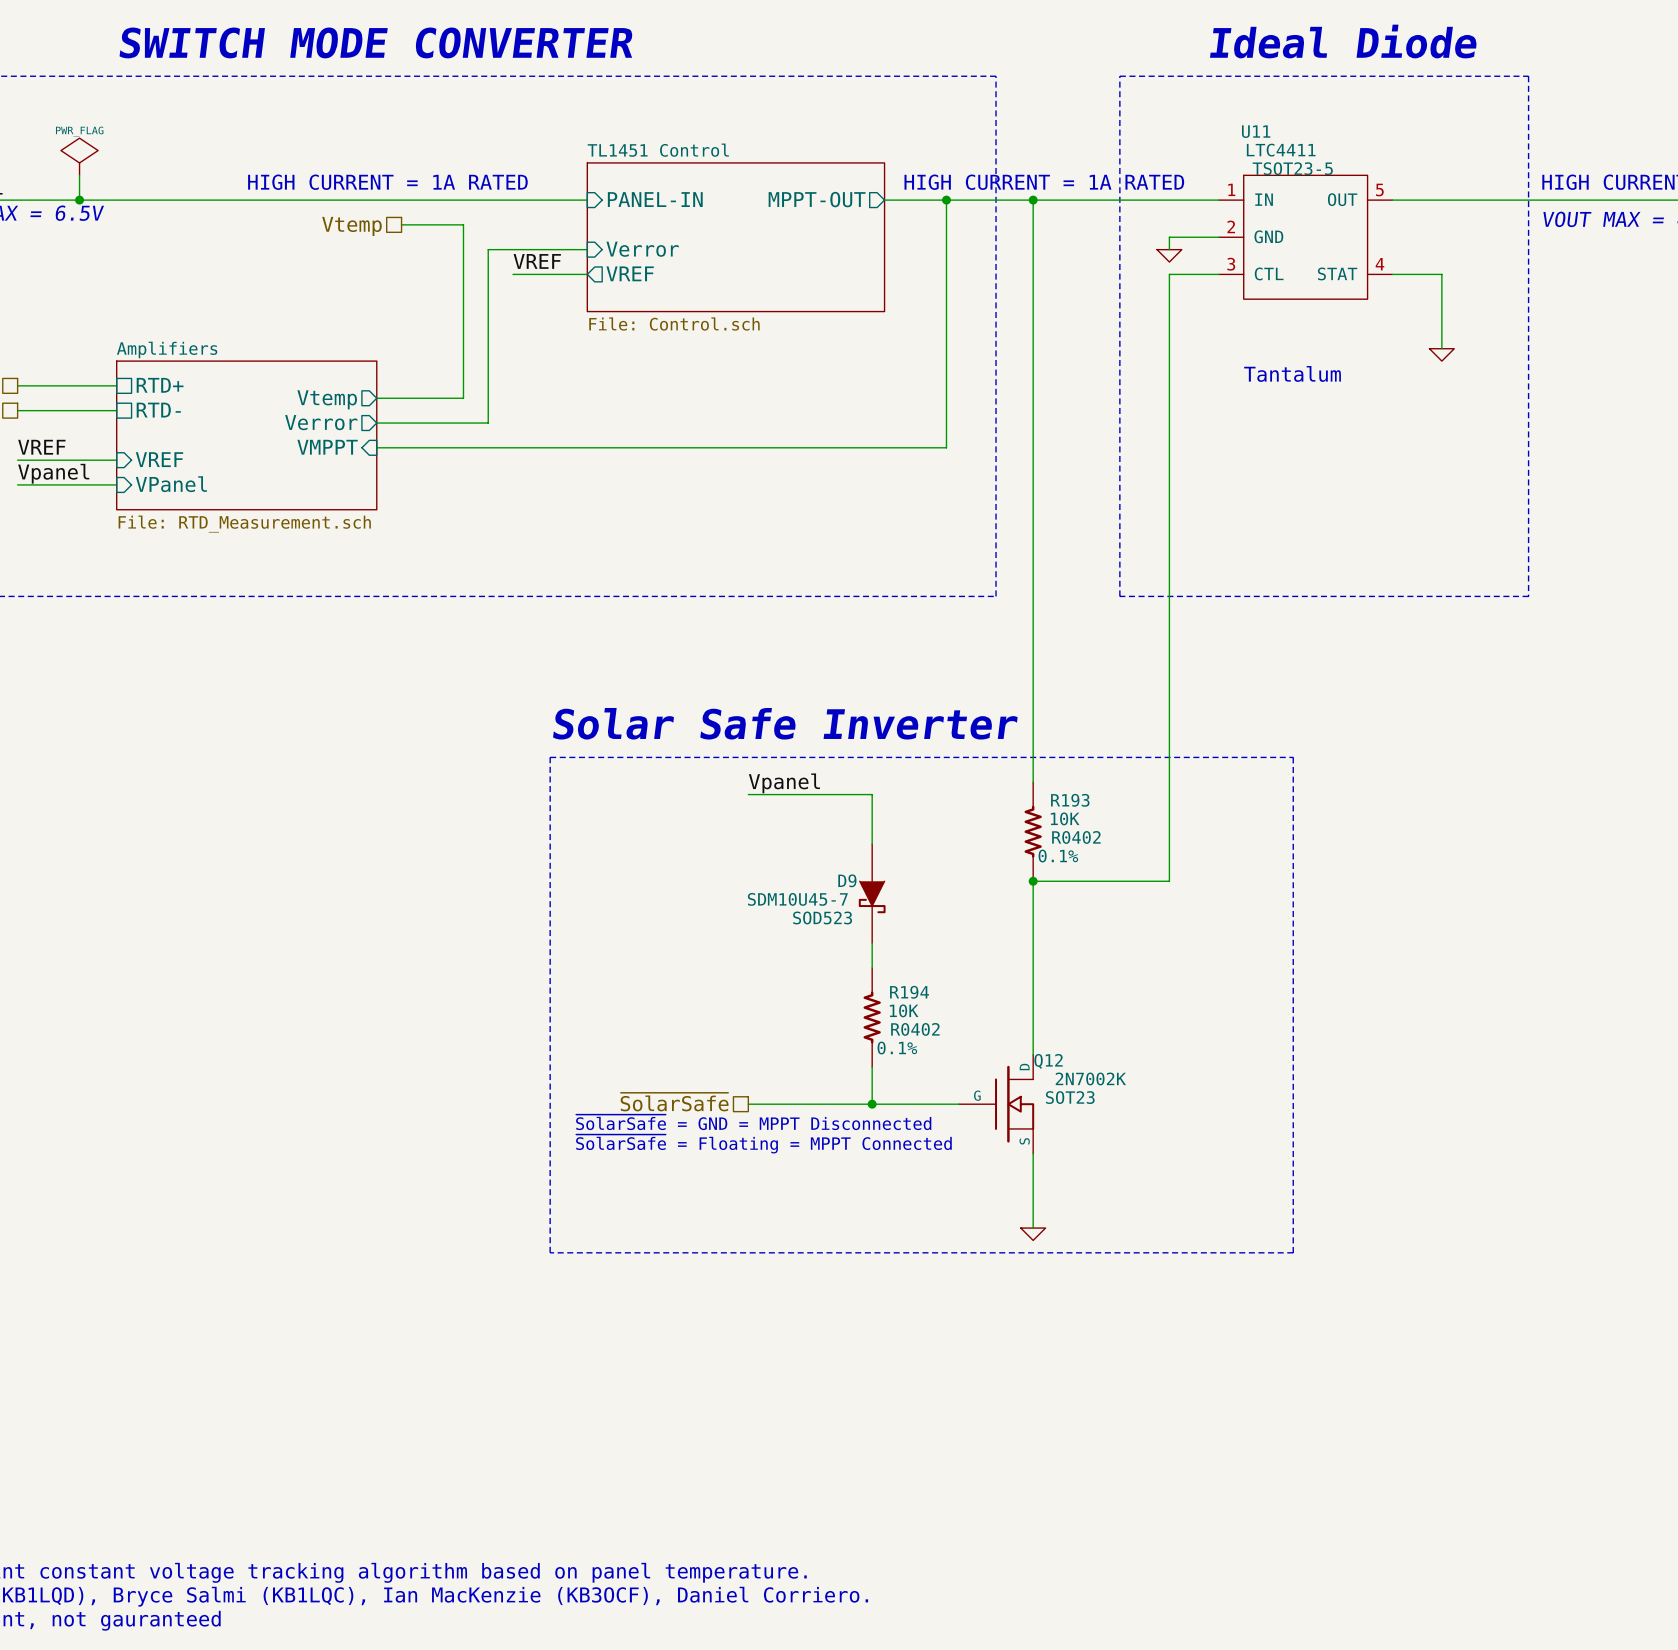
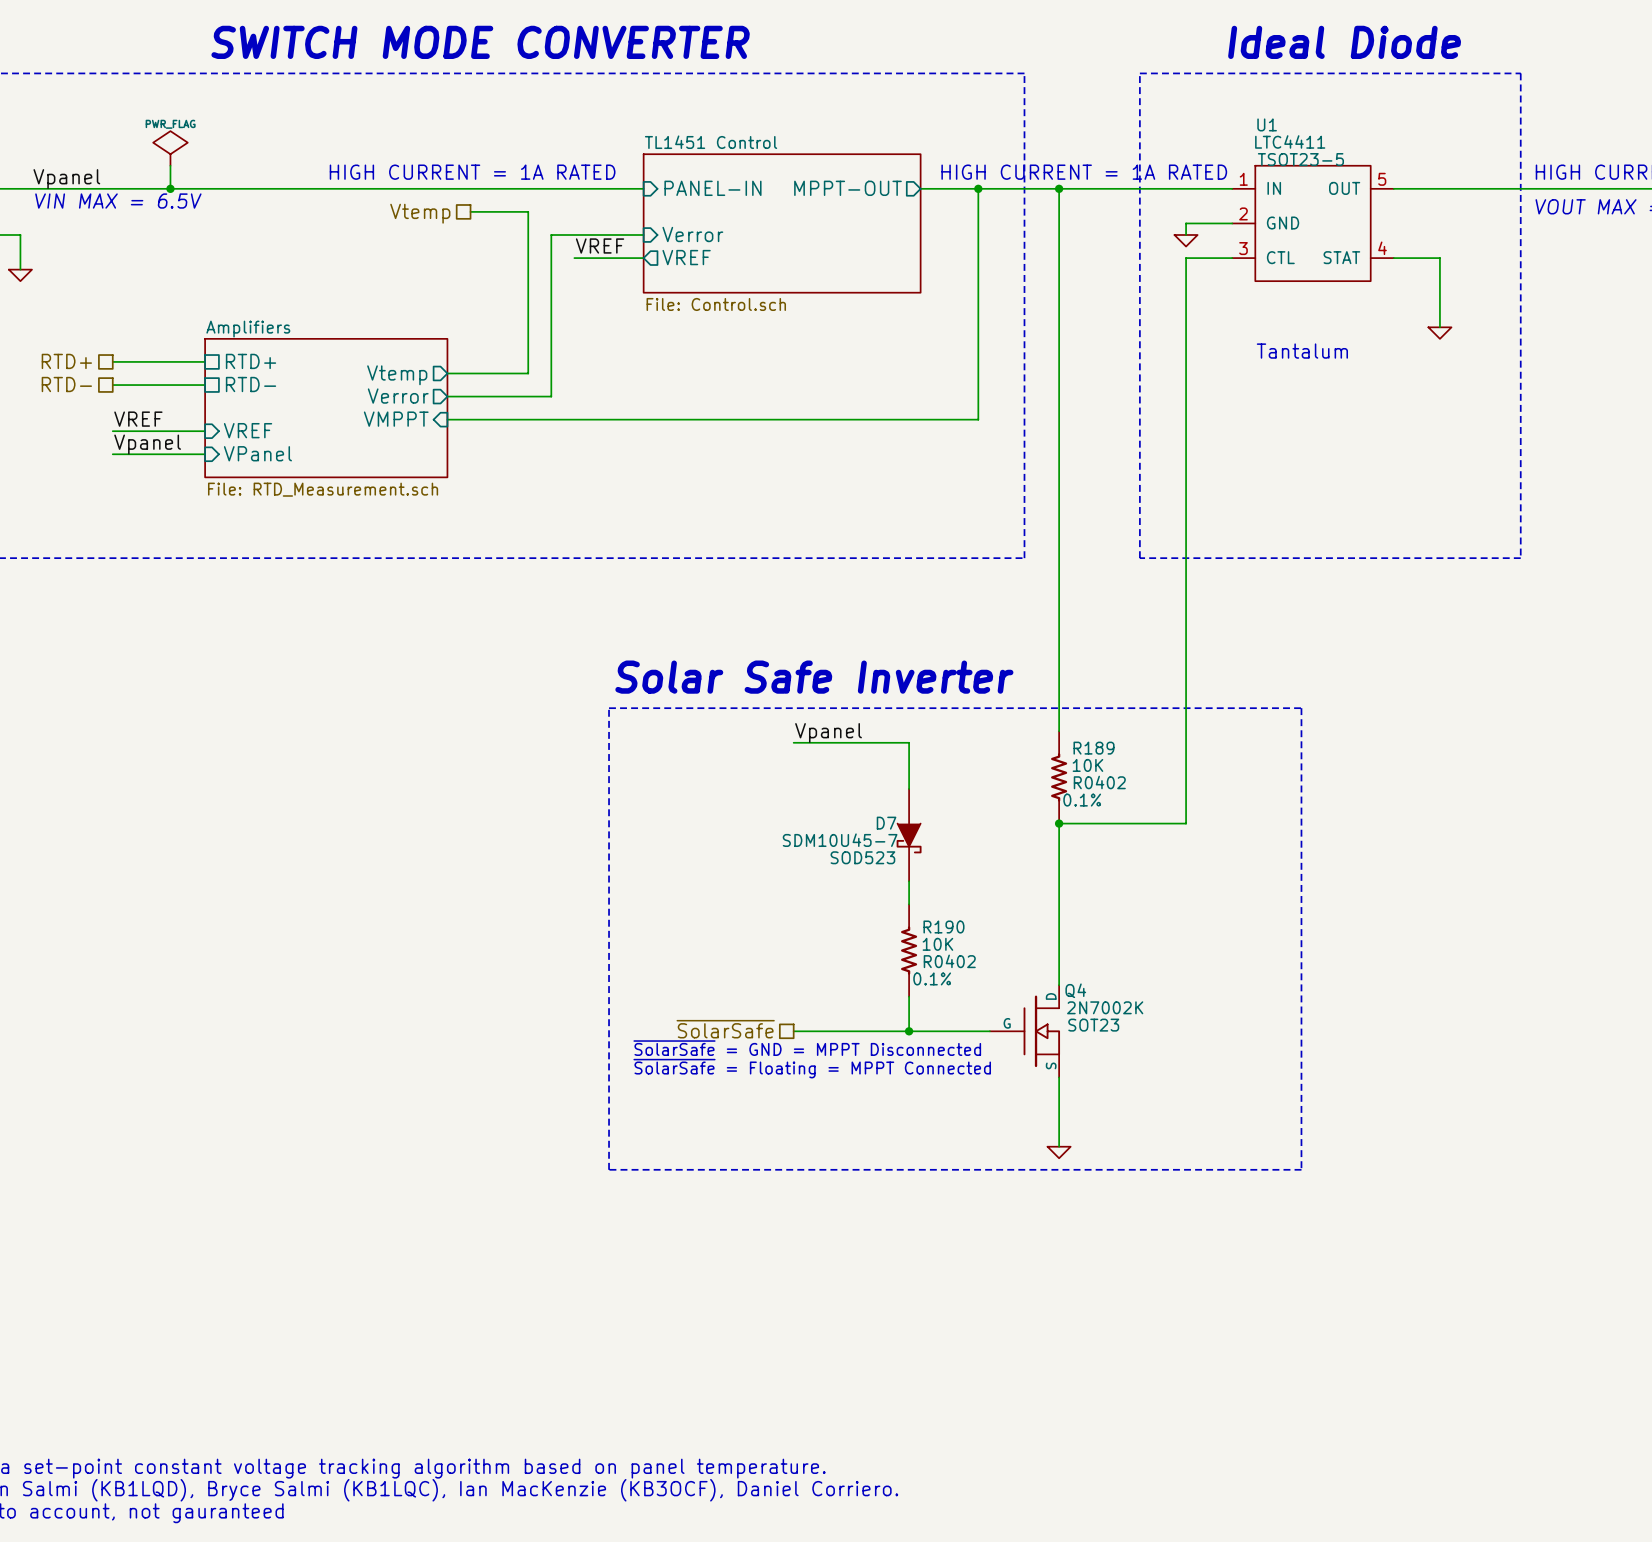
U11 name: U11 (1256, 131) -> U1 (1267, 124)
R193 name: R193 (1070, 800) -> R189 (1094, 748)
D9 name: D9 (847, 880) -> D7 (886, 823)
R194 name: R194 (909, 992) -> R190 (943, 927)
Q12 name: Q12 (1048, 1061) -> Q4 (1075, 990)

